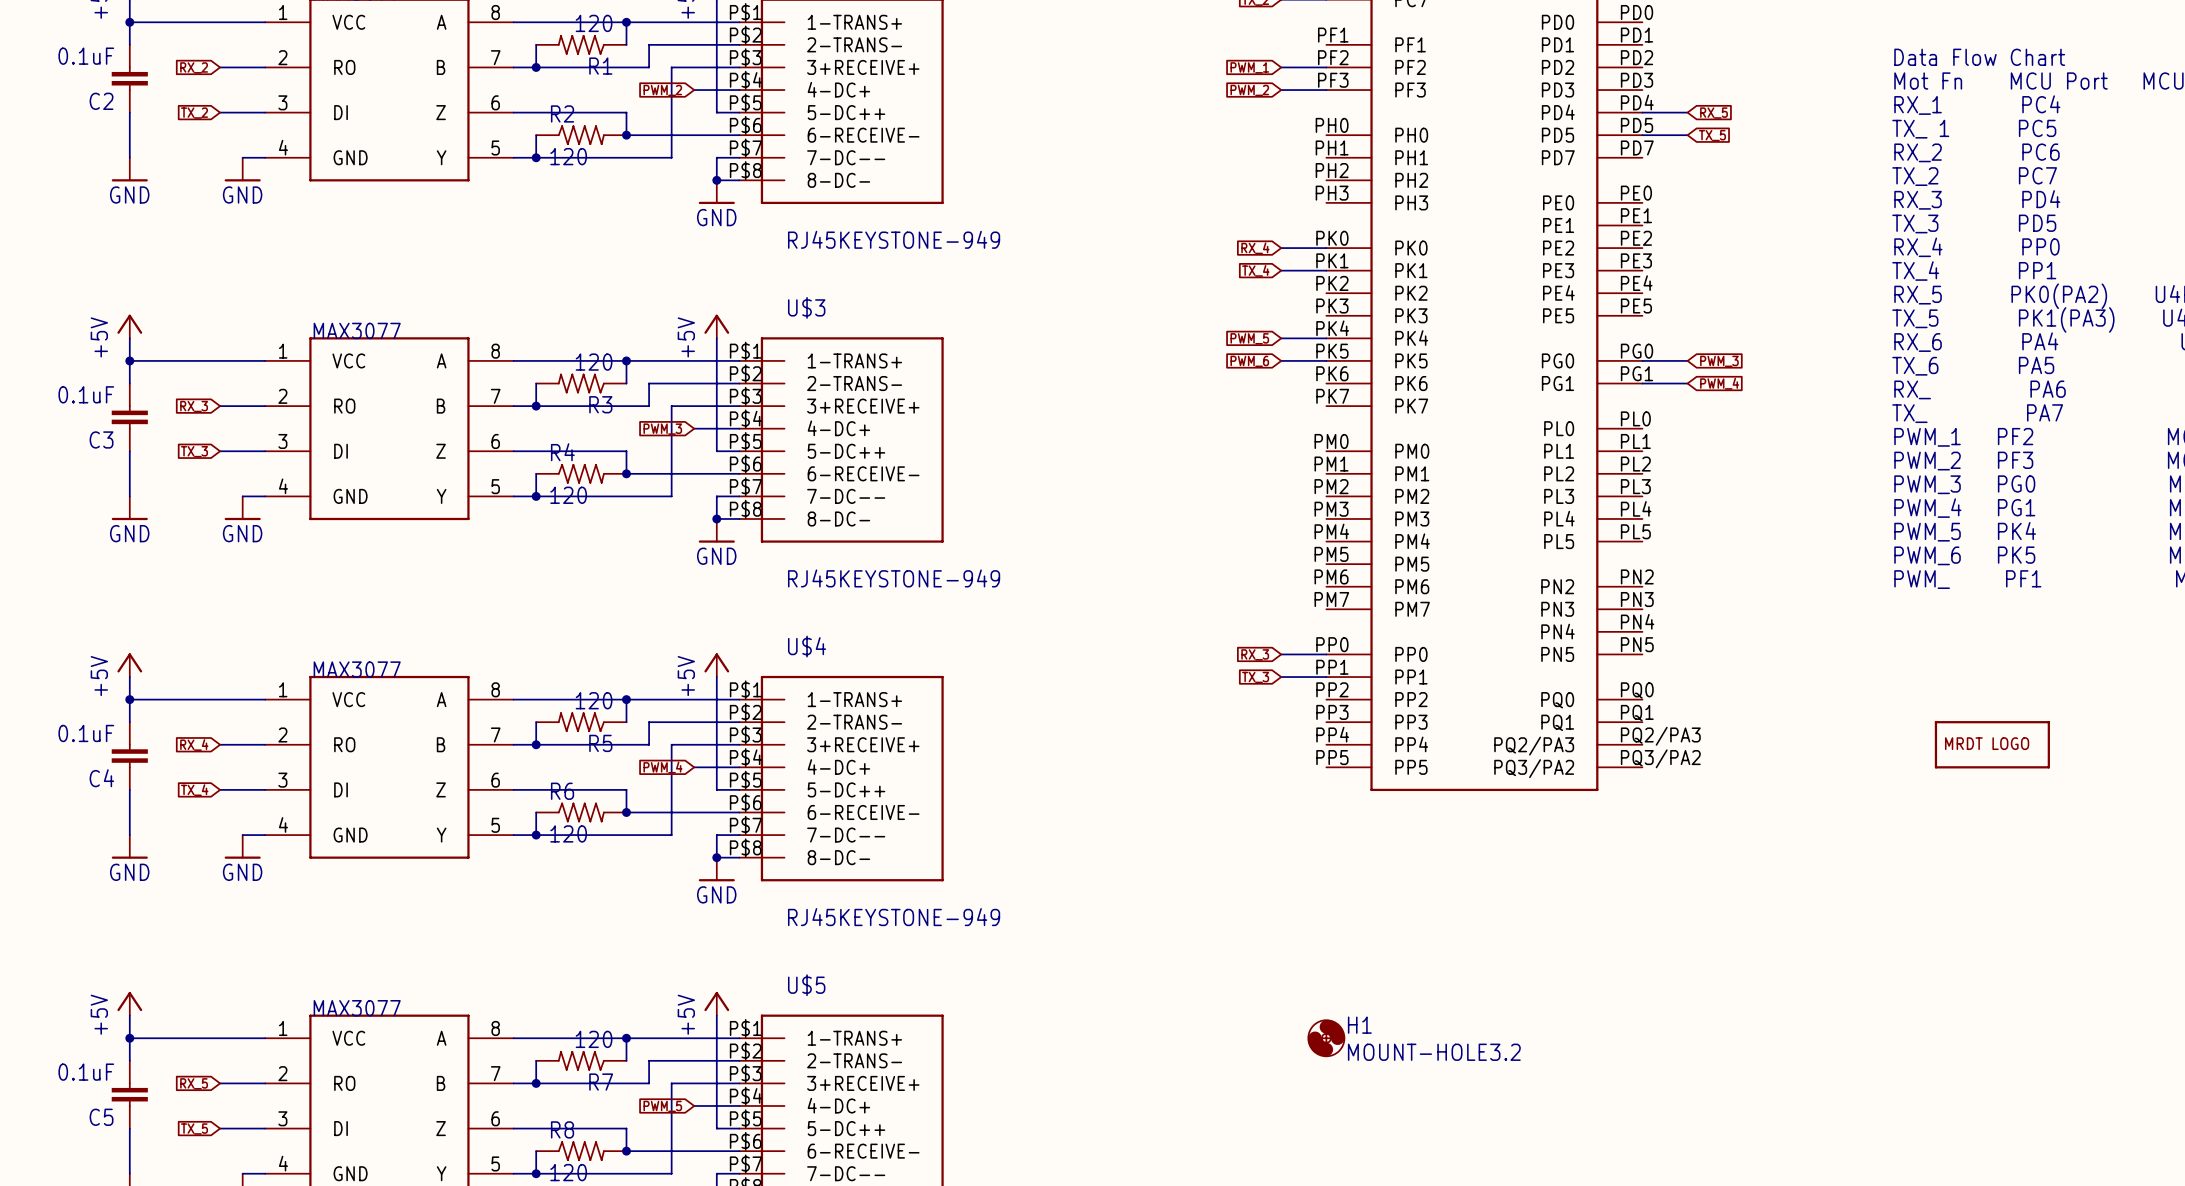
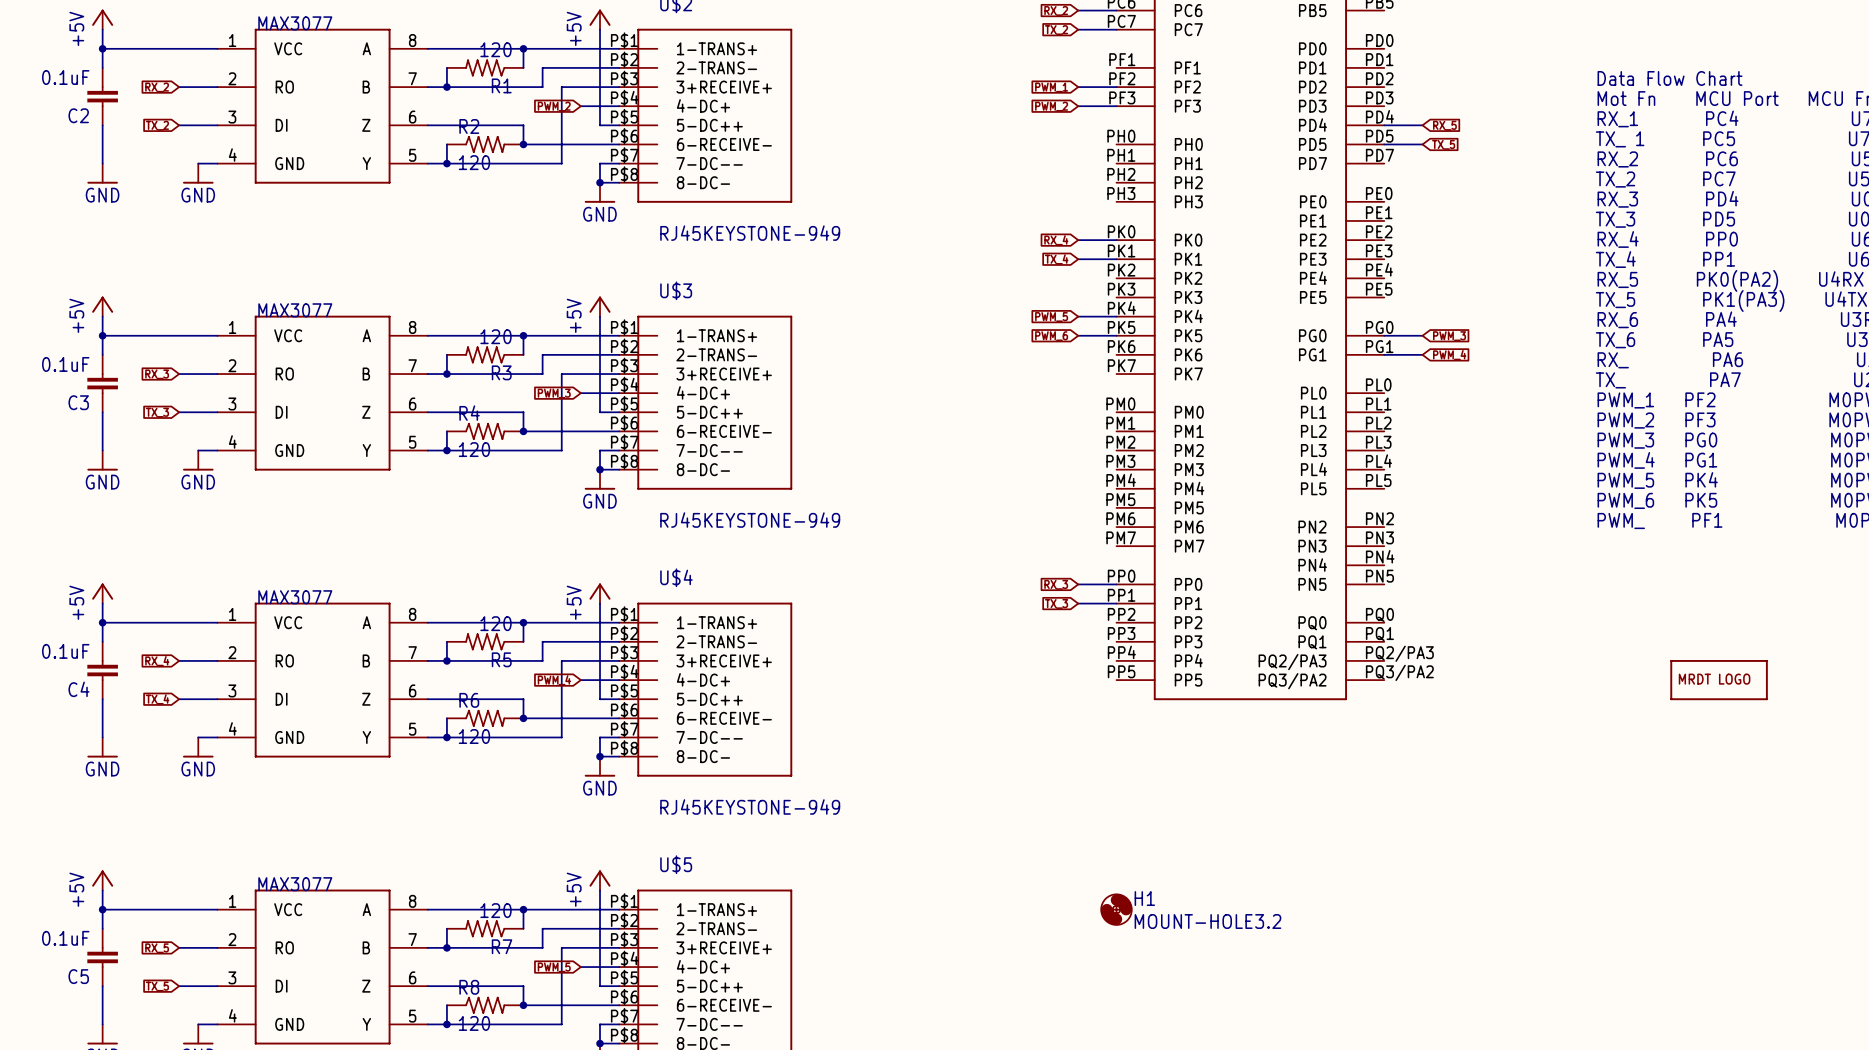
part position: (1992, 744) -> (1719, 680)

